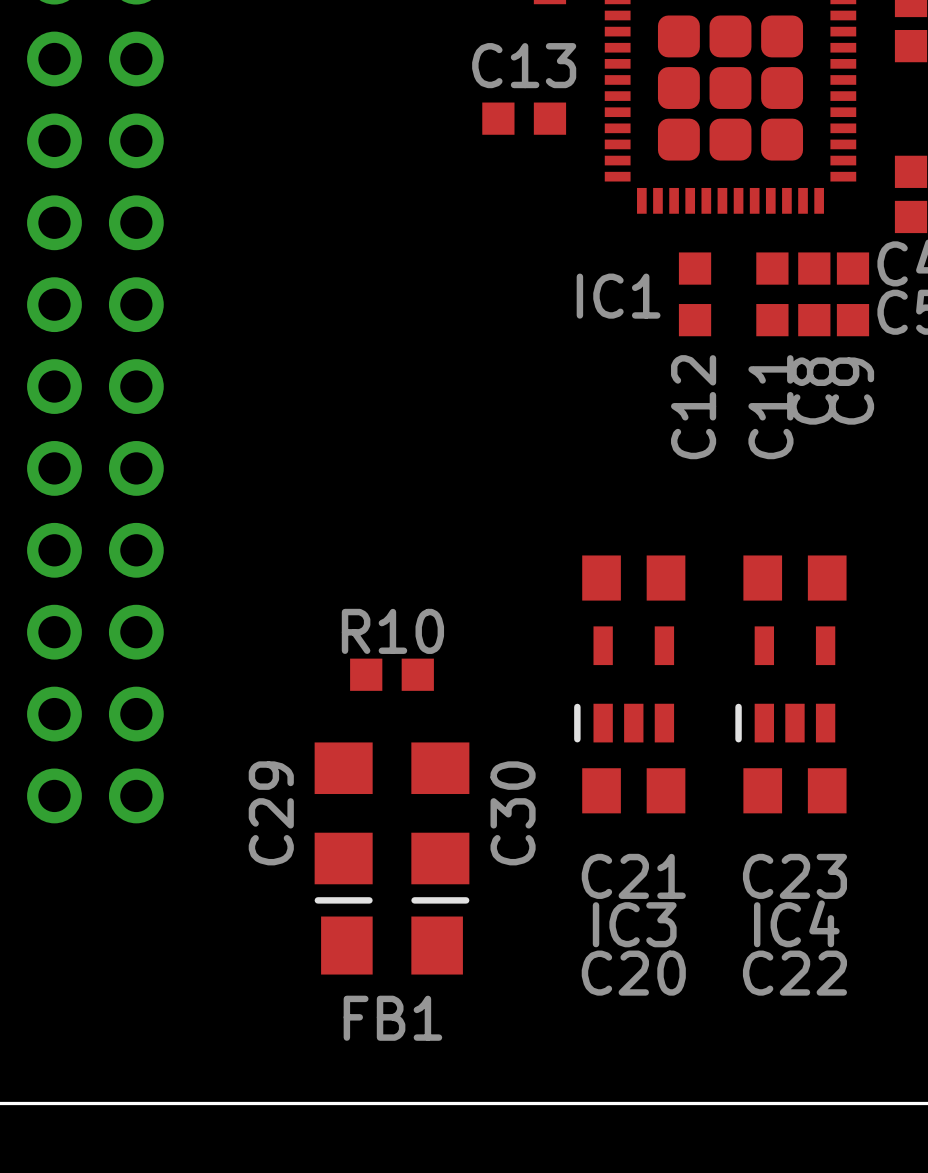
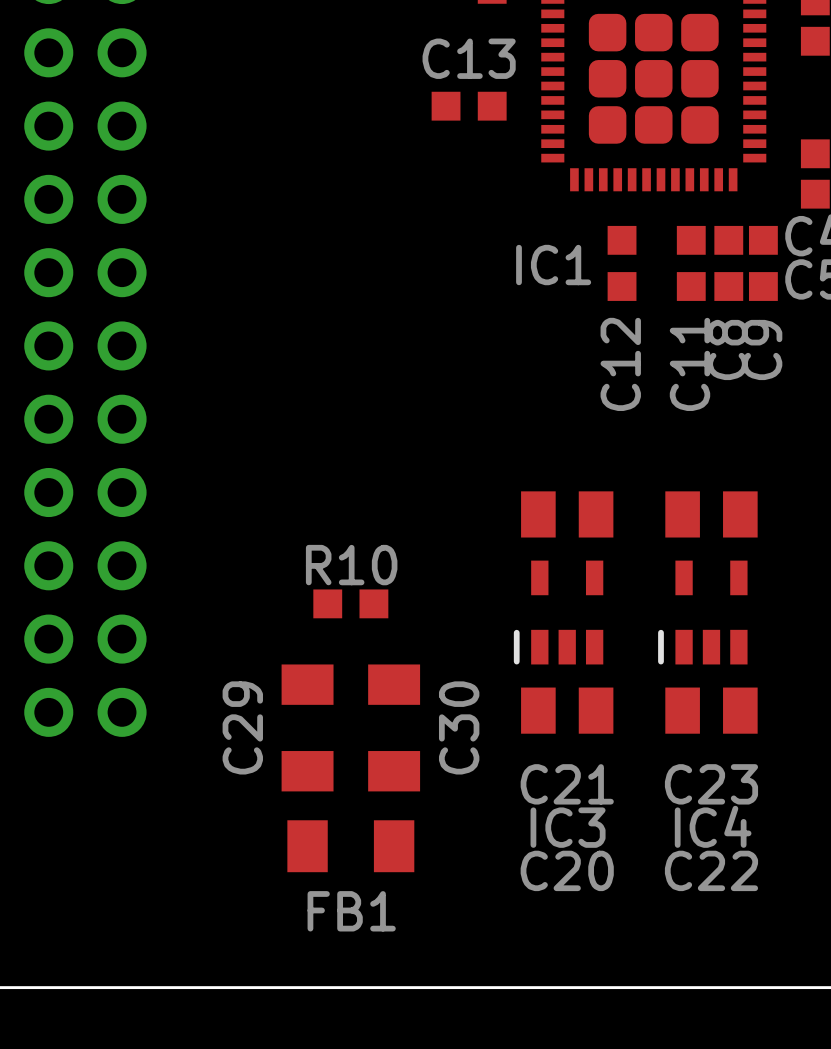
C21 footprint: [582, 555, 686, 601] -> [521, 491, 614, 538]
C23 footprint: [743, 555, 847, 601] -> [665, 491, 758, 538]
C29 footprint: [314, 742, 373, 904] -> [281, 664, 334, 792]
C30 footprint: [411, 742, 470, 904] -> [368, 664, 421, 792]
C20 footprint: [582, 768, 686, 814] -> [521, 687, 614, 734]
C22 footprint: [743, 768, 847, 814] -> [665, 687, 758, 734]
FB1 footprint: [321, 916, 463, 975] -> [287, 820, 415, 873]

